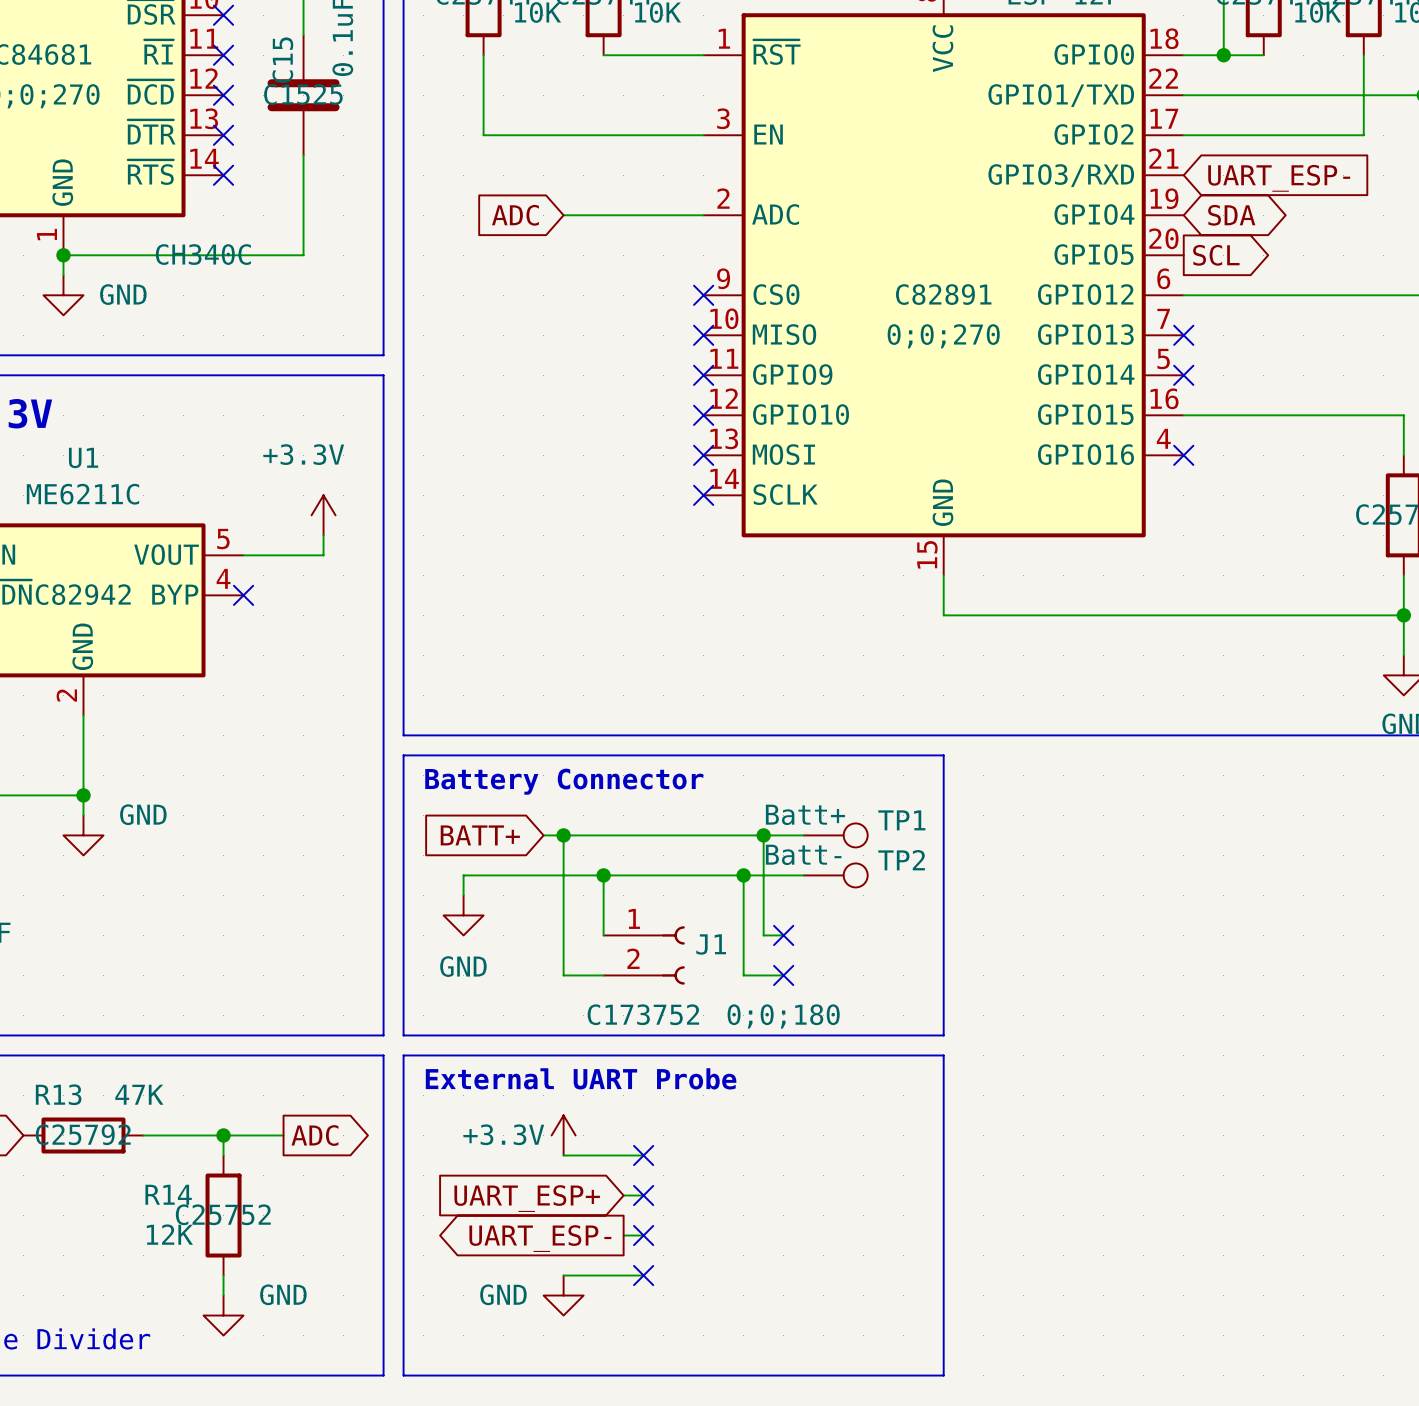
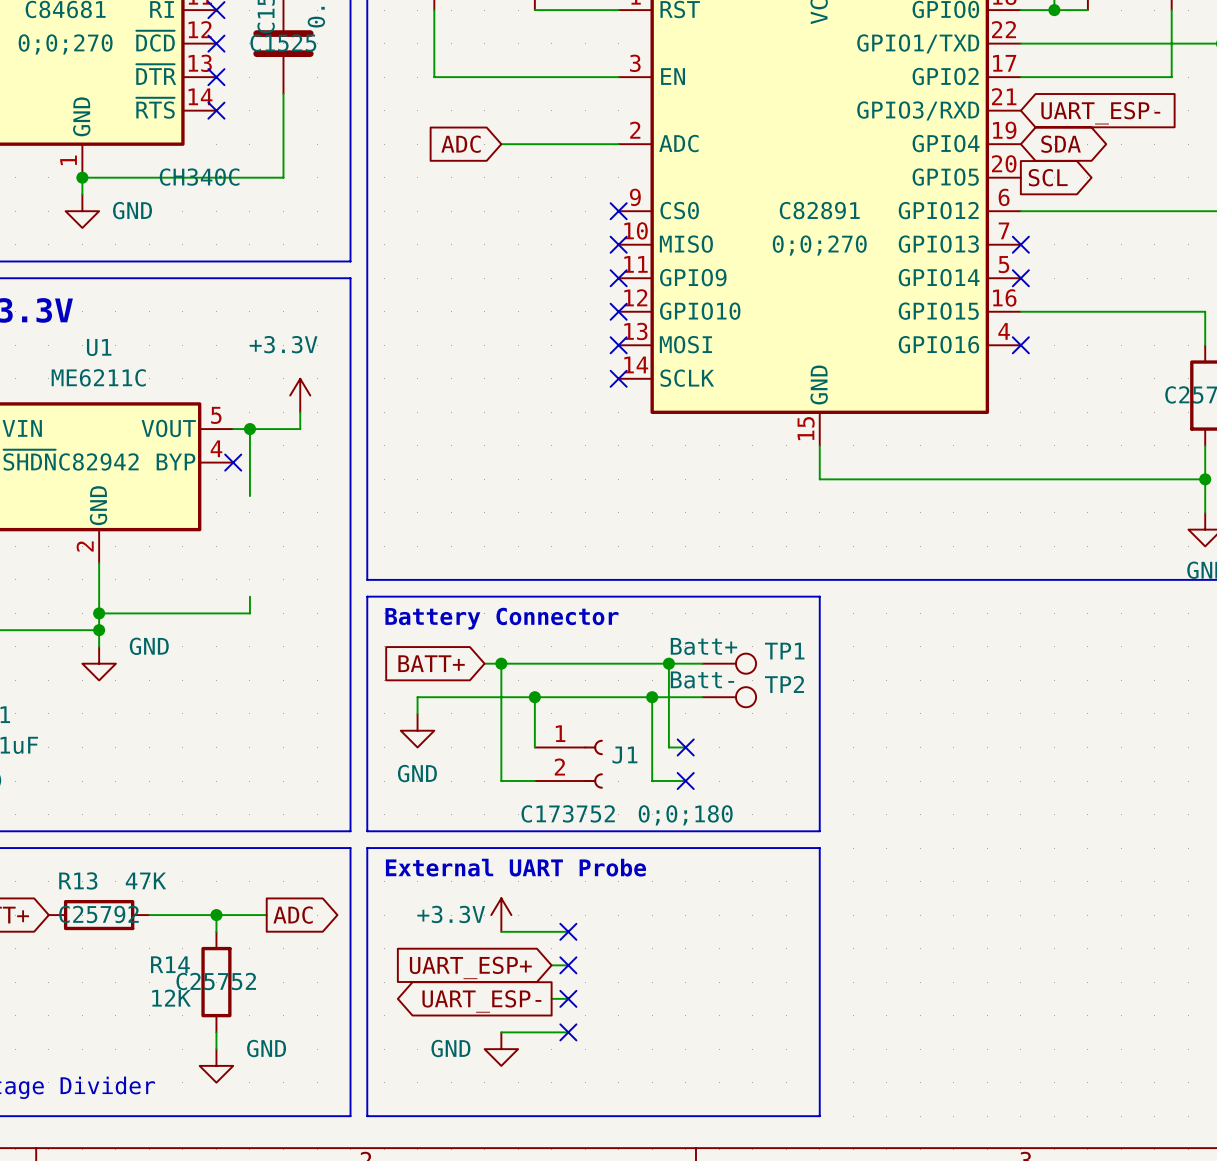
wire: none -> (249, 429) (249, 496)
junction: none -> (249, 429)
wire: none -> (249, 596) (249, 613) (99, 613)
junction: none -> (99, 613)

